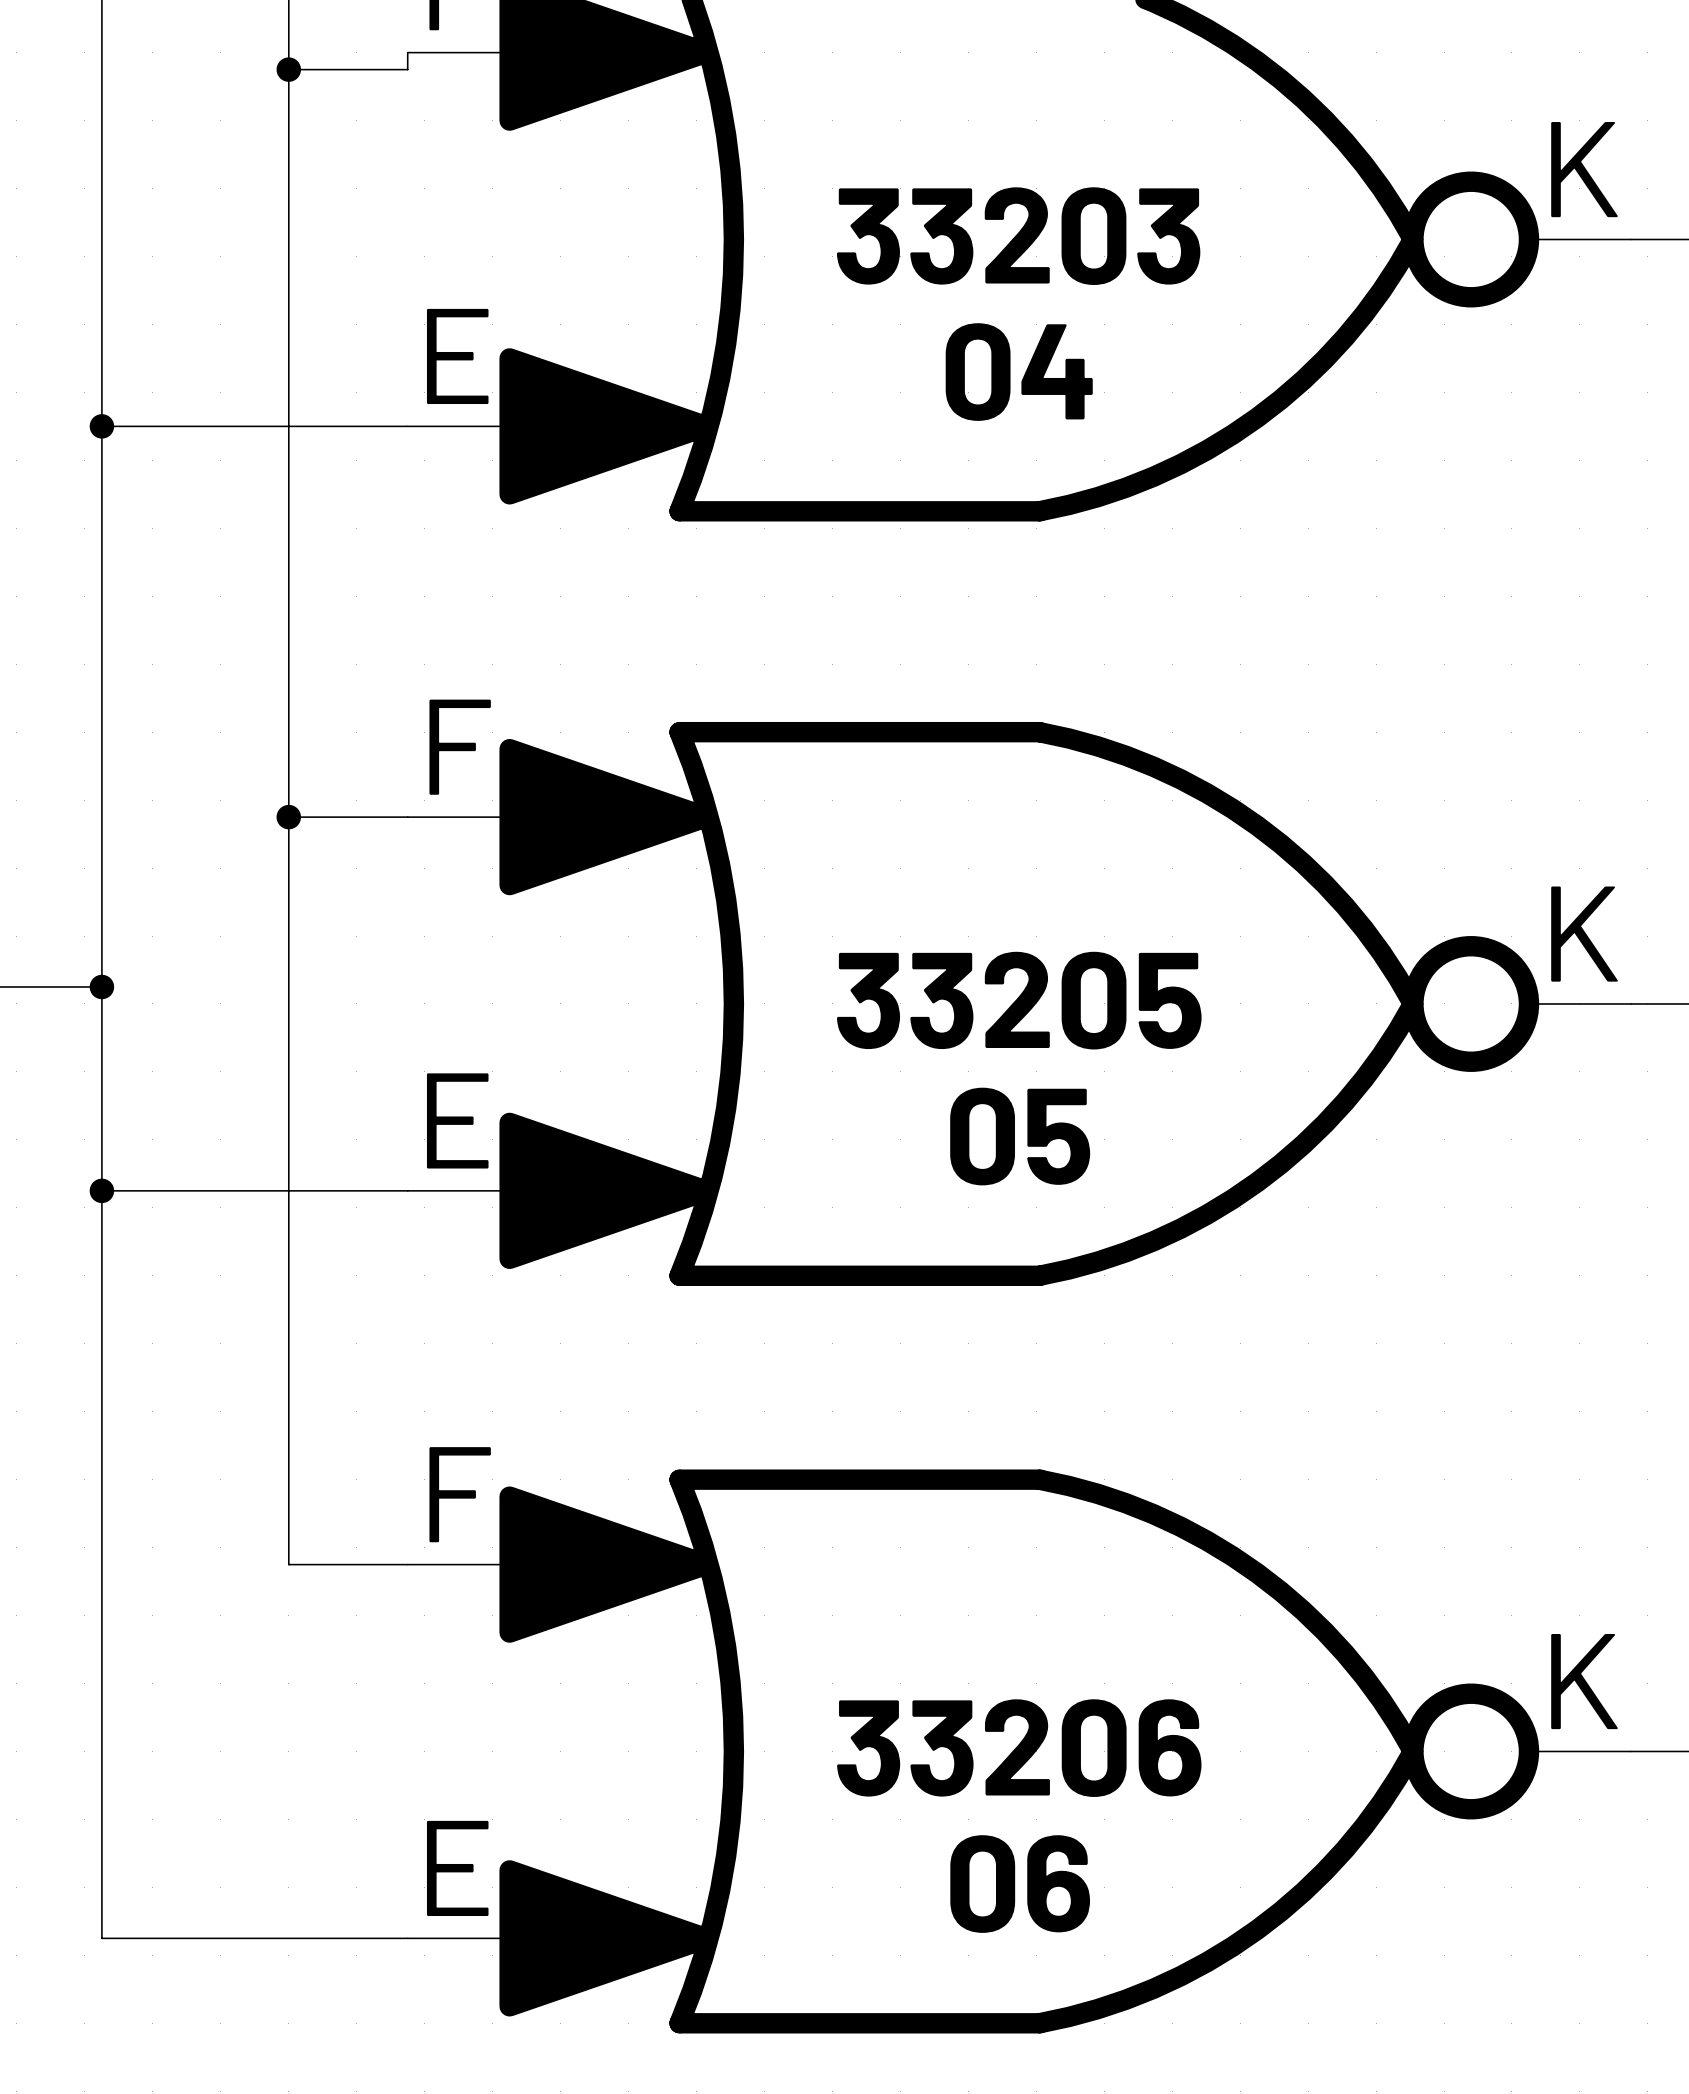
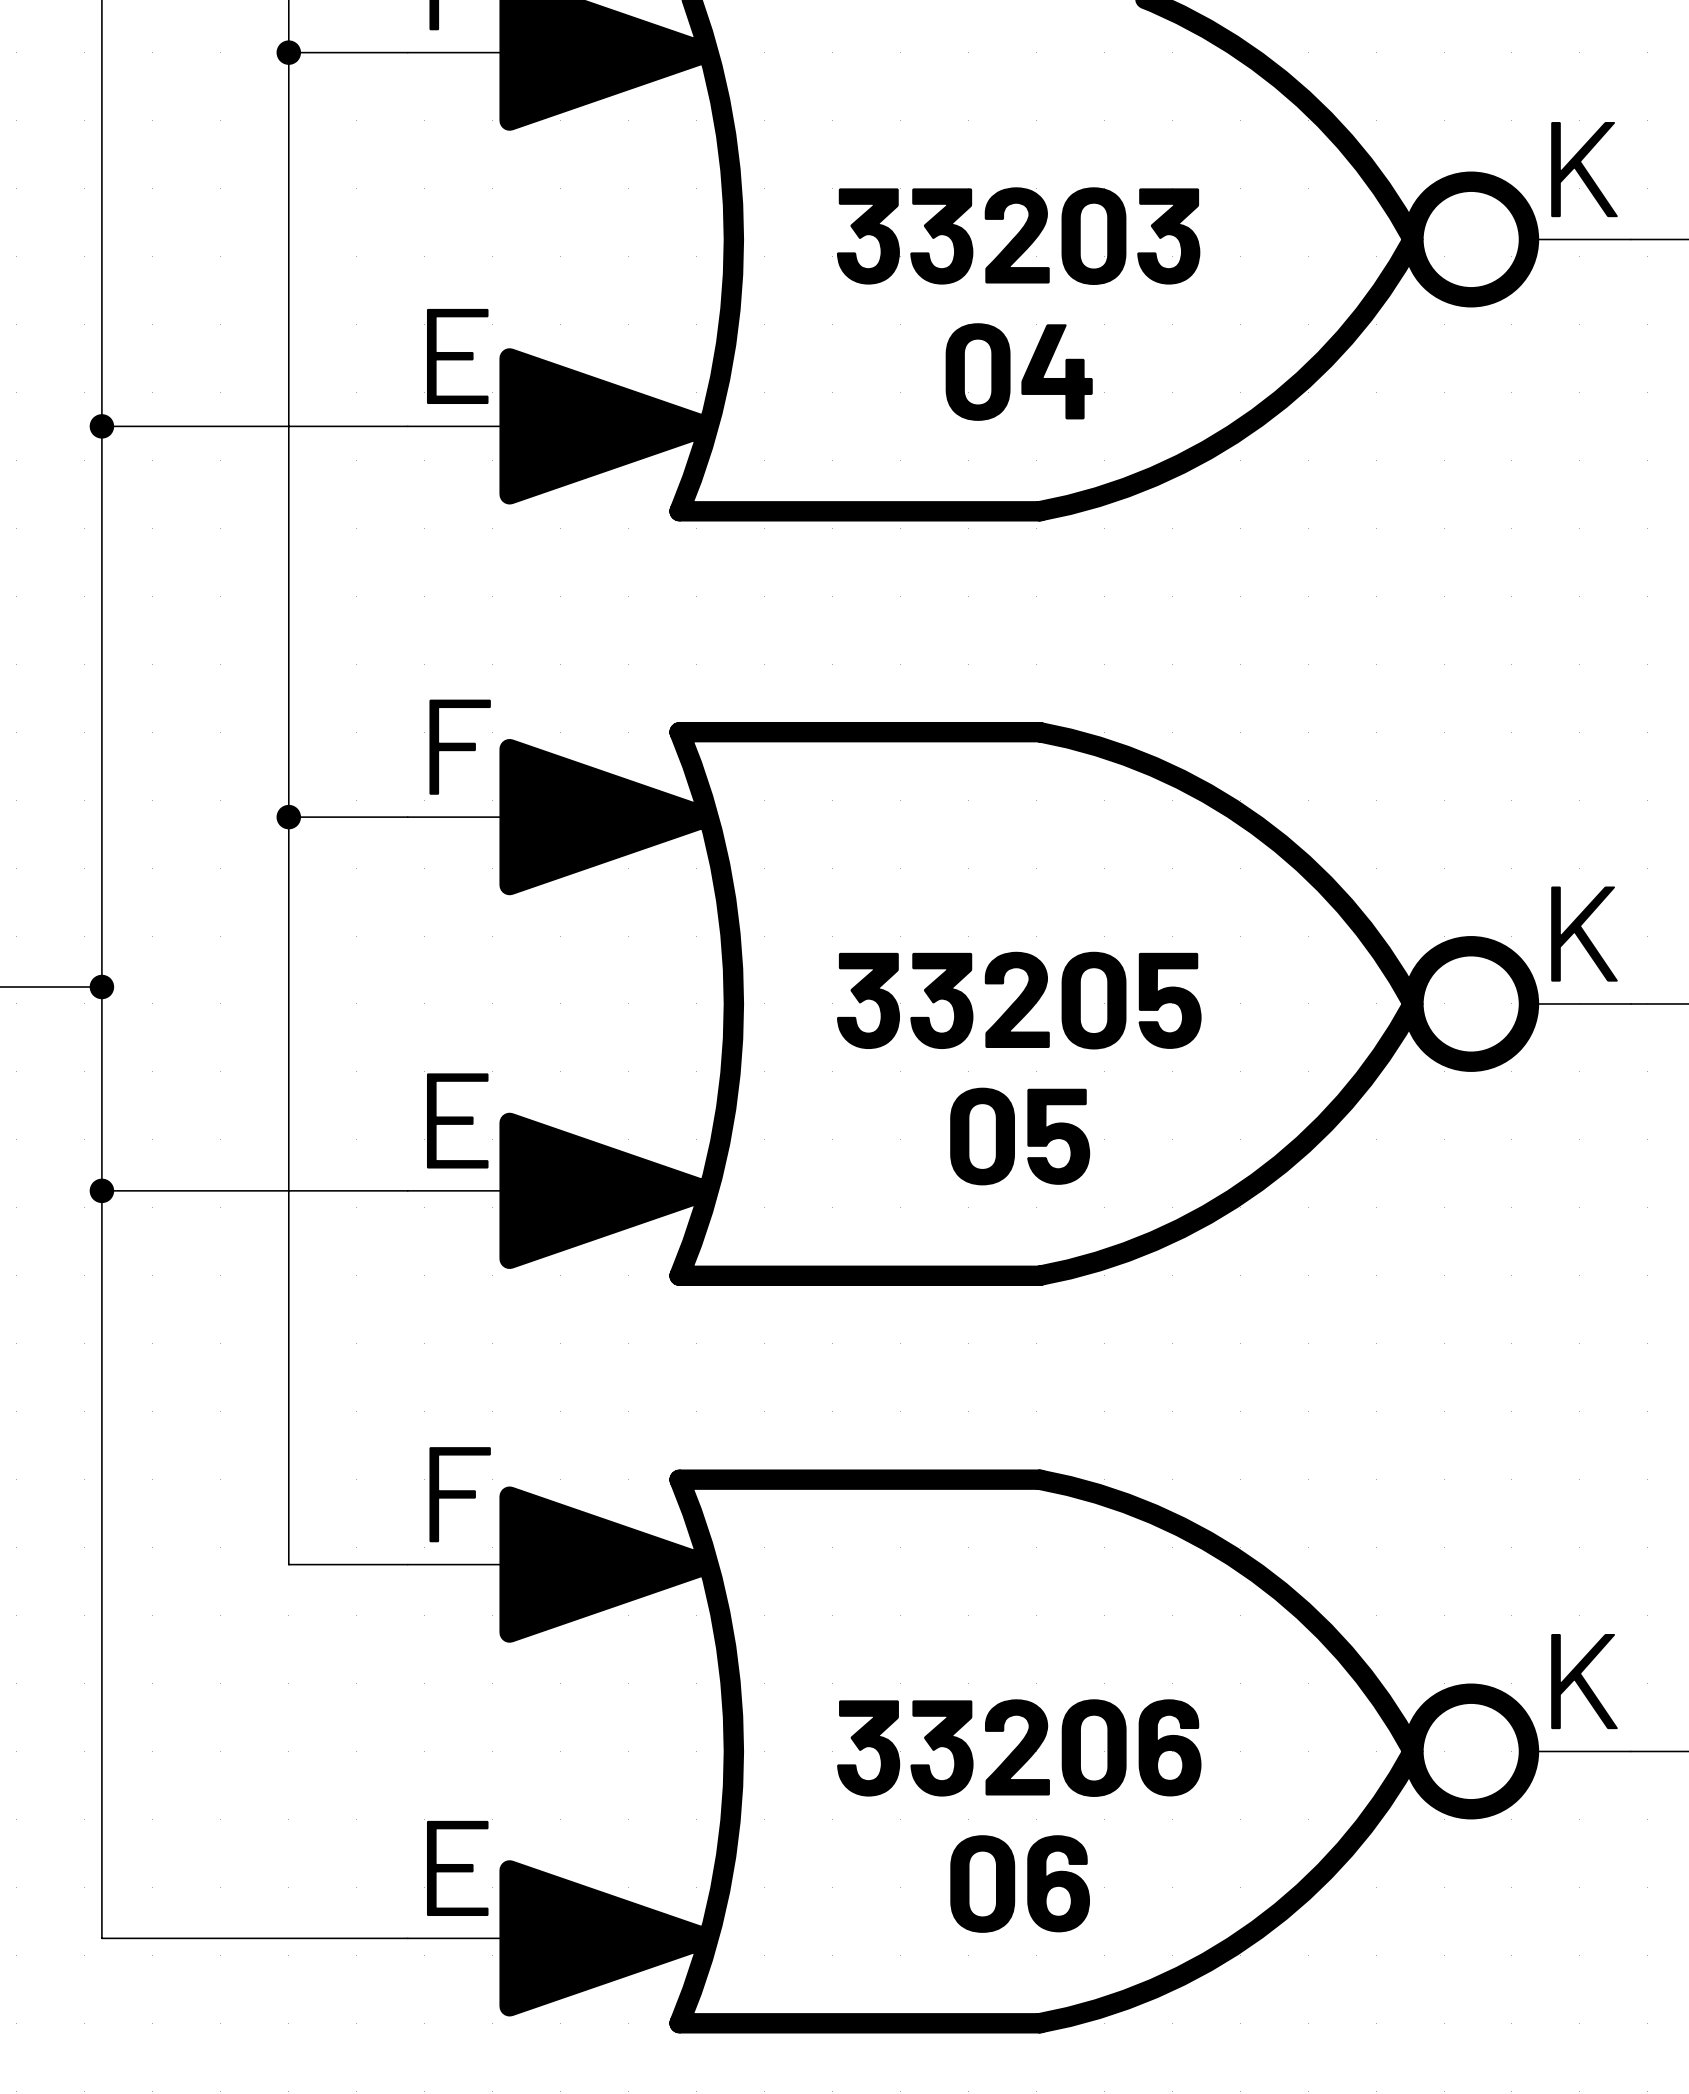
wire: (407, 52) (407, 69) (288, 69) -> (407, 52) (288, 52)
junction position: (288, 69) -> (288, 52)

